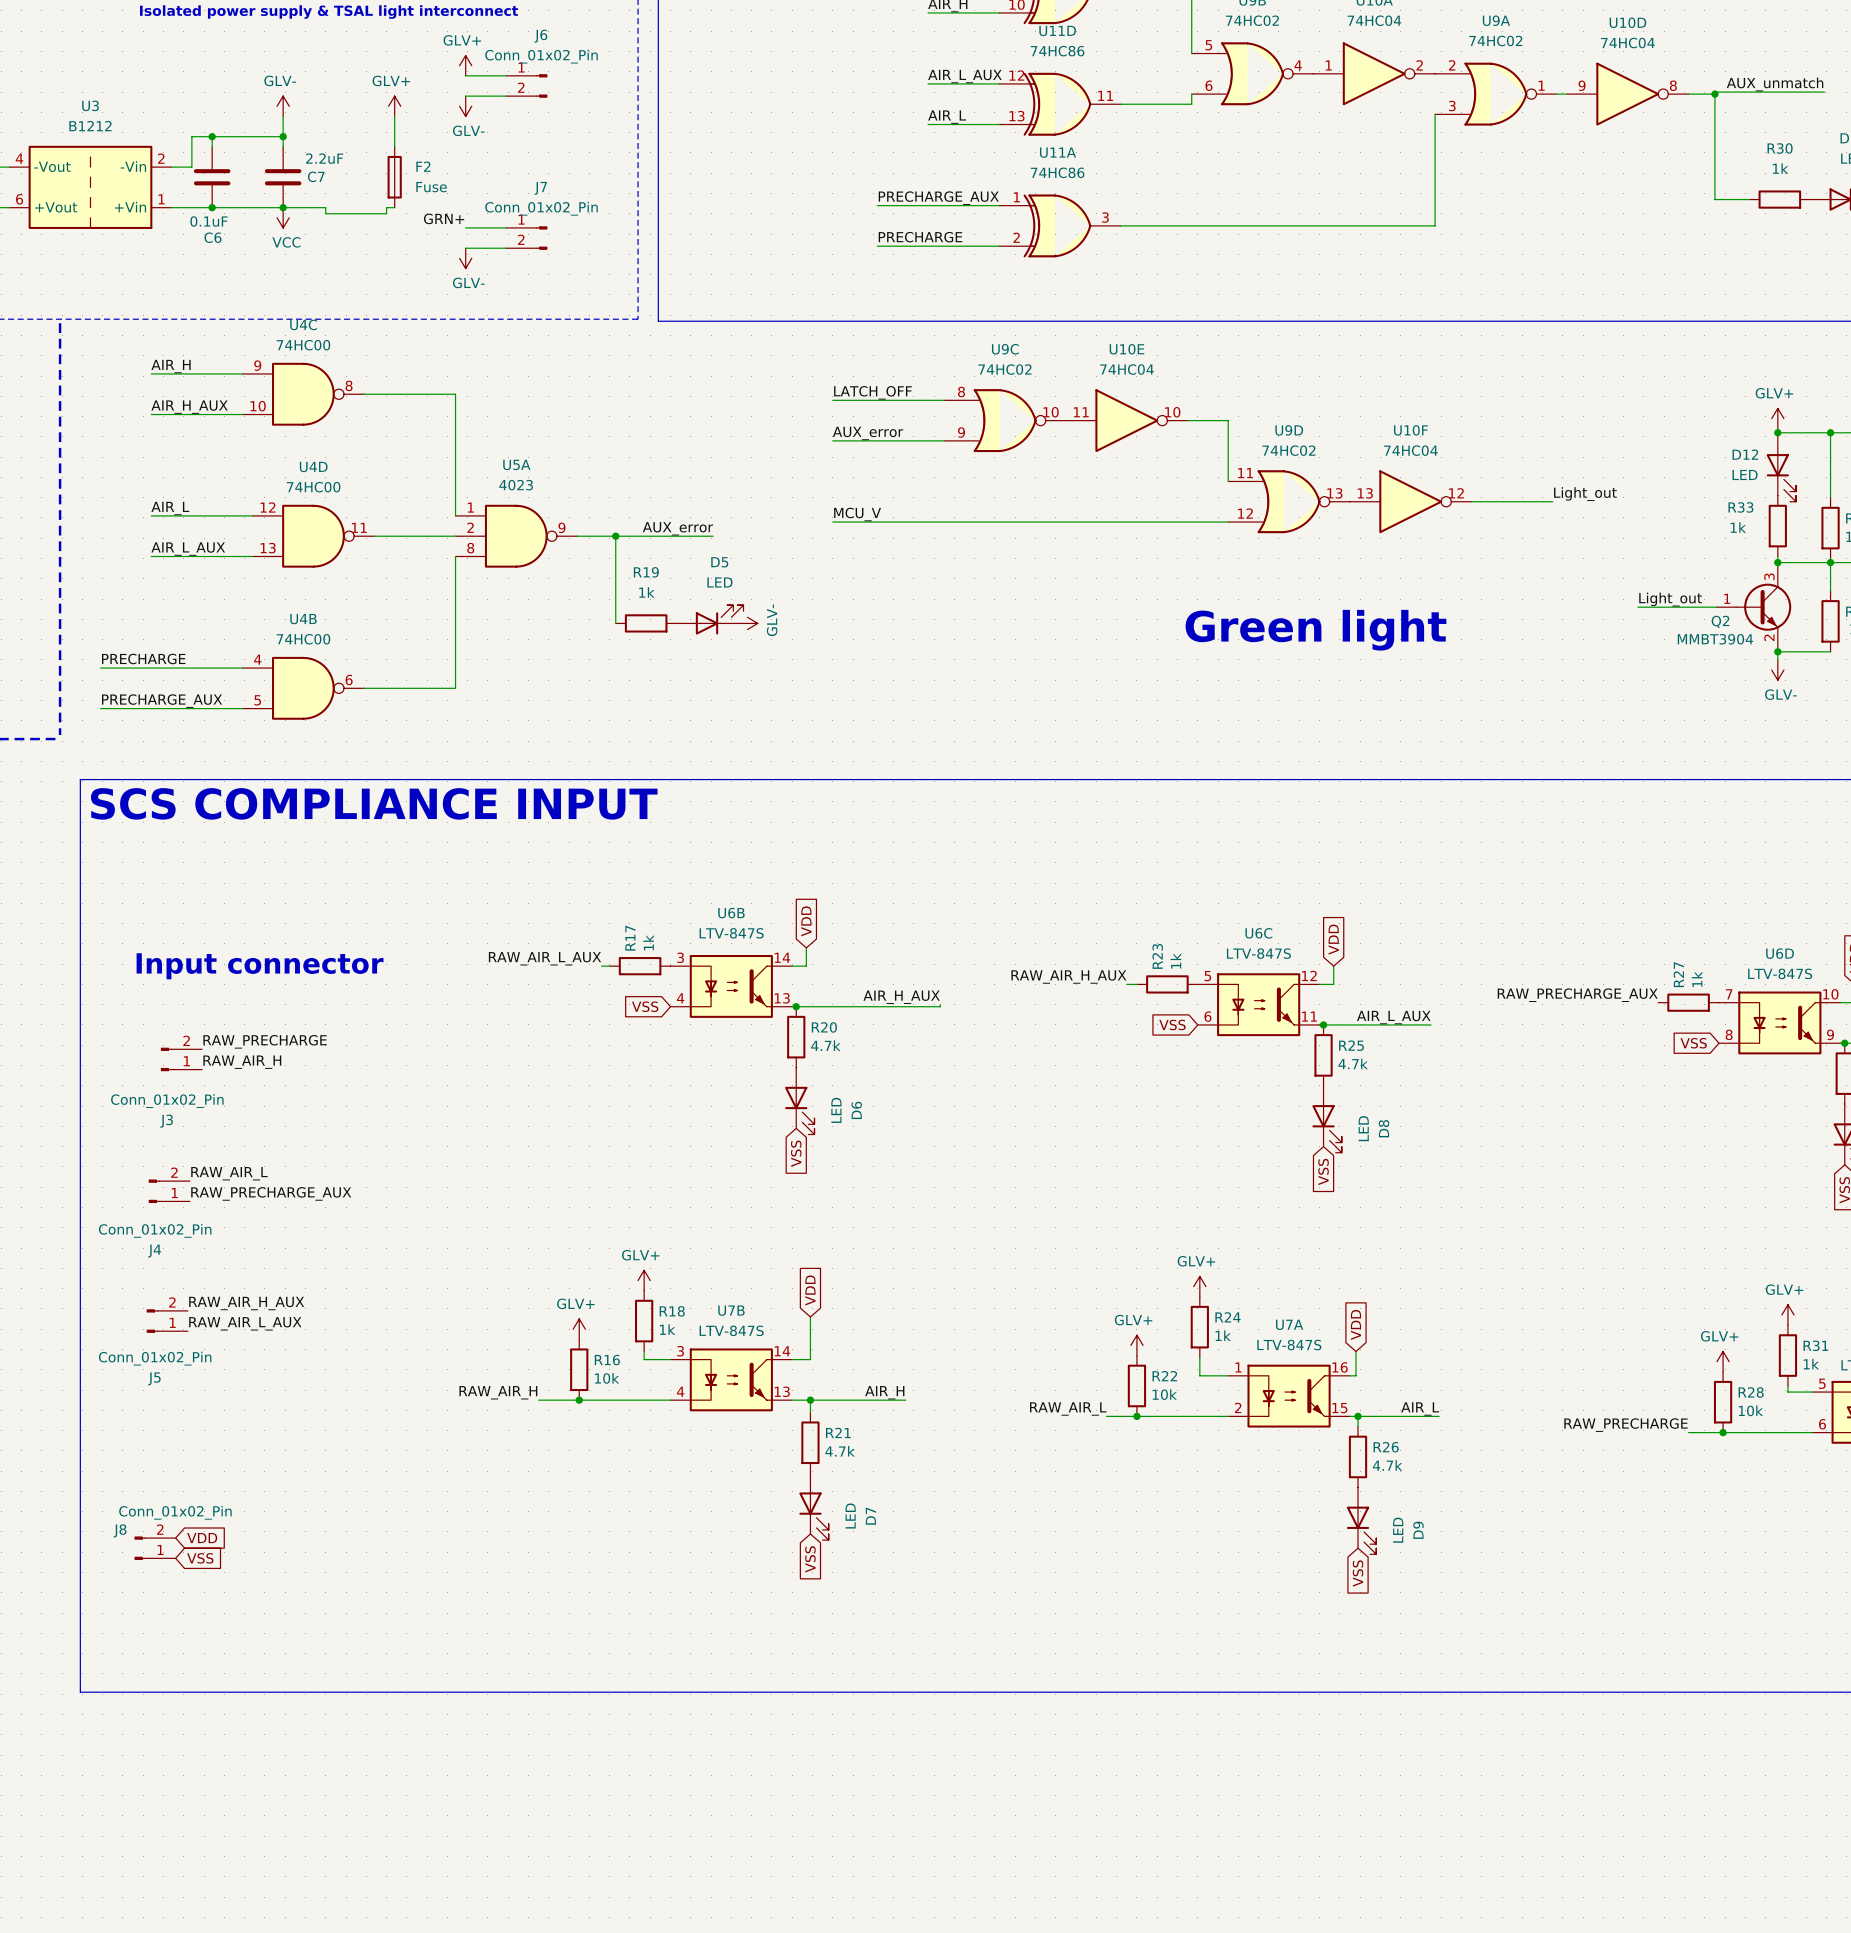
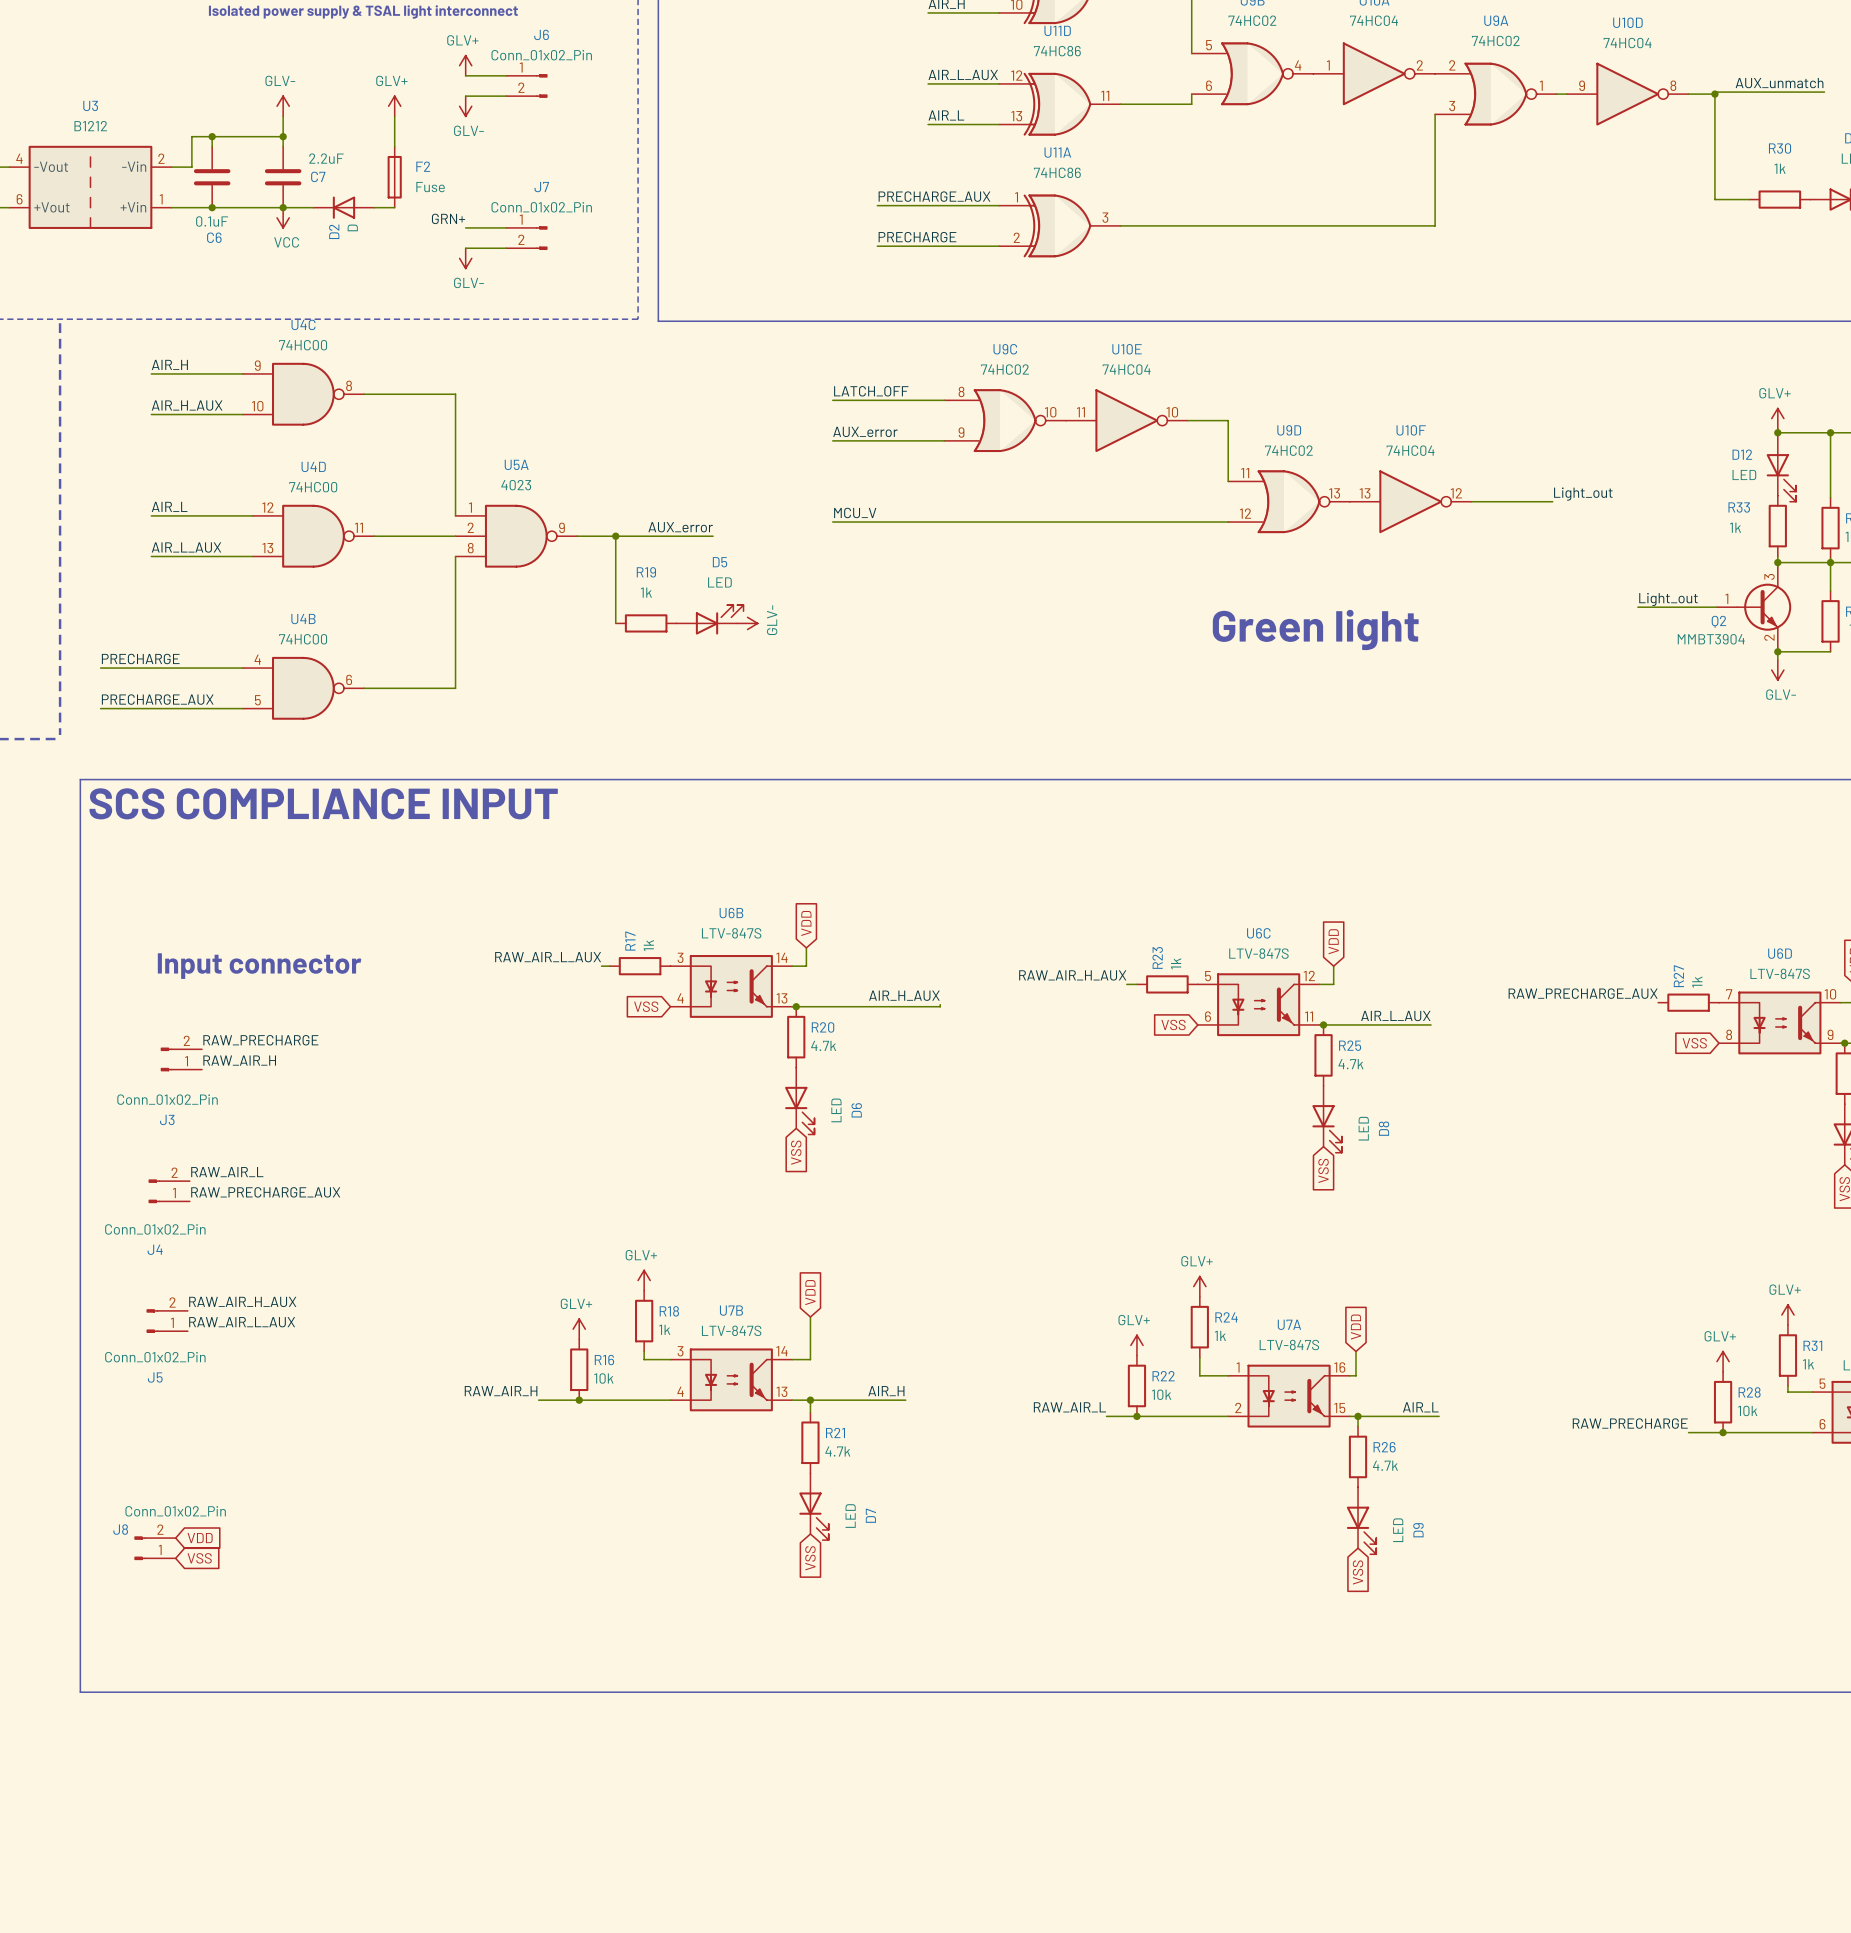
wire: (313, 207) (325, 207) (325, 213) (386, 213) (386, 207) -> (374, 207) (386, 207)
D2: none -> D (343, 207)

